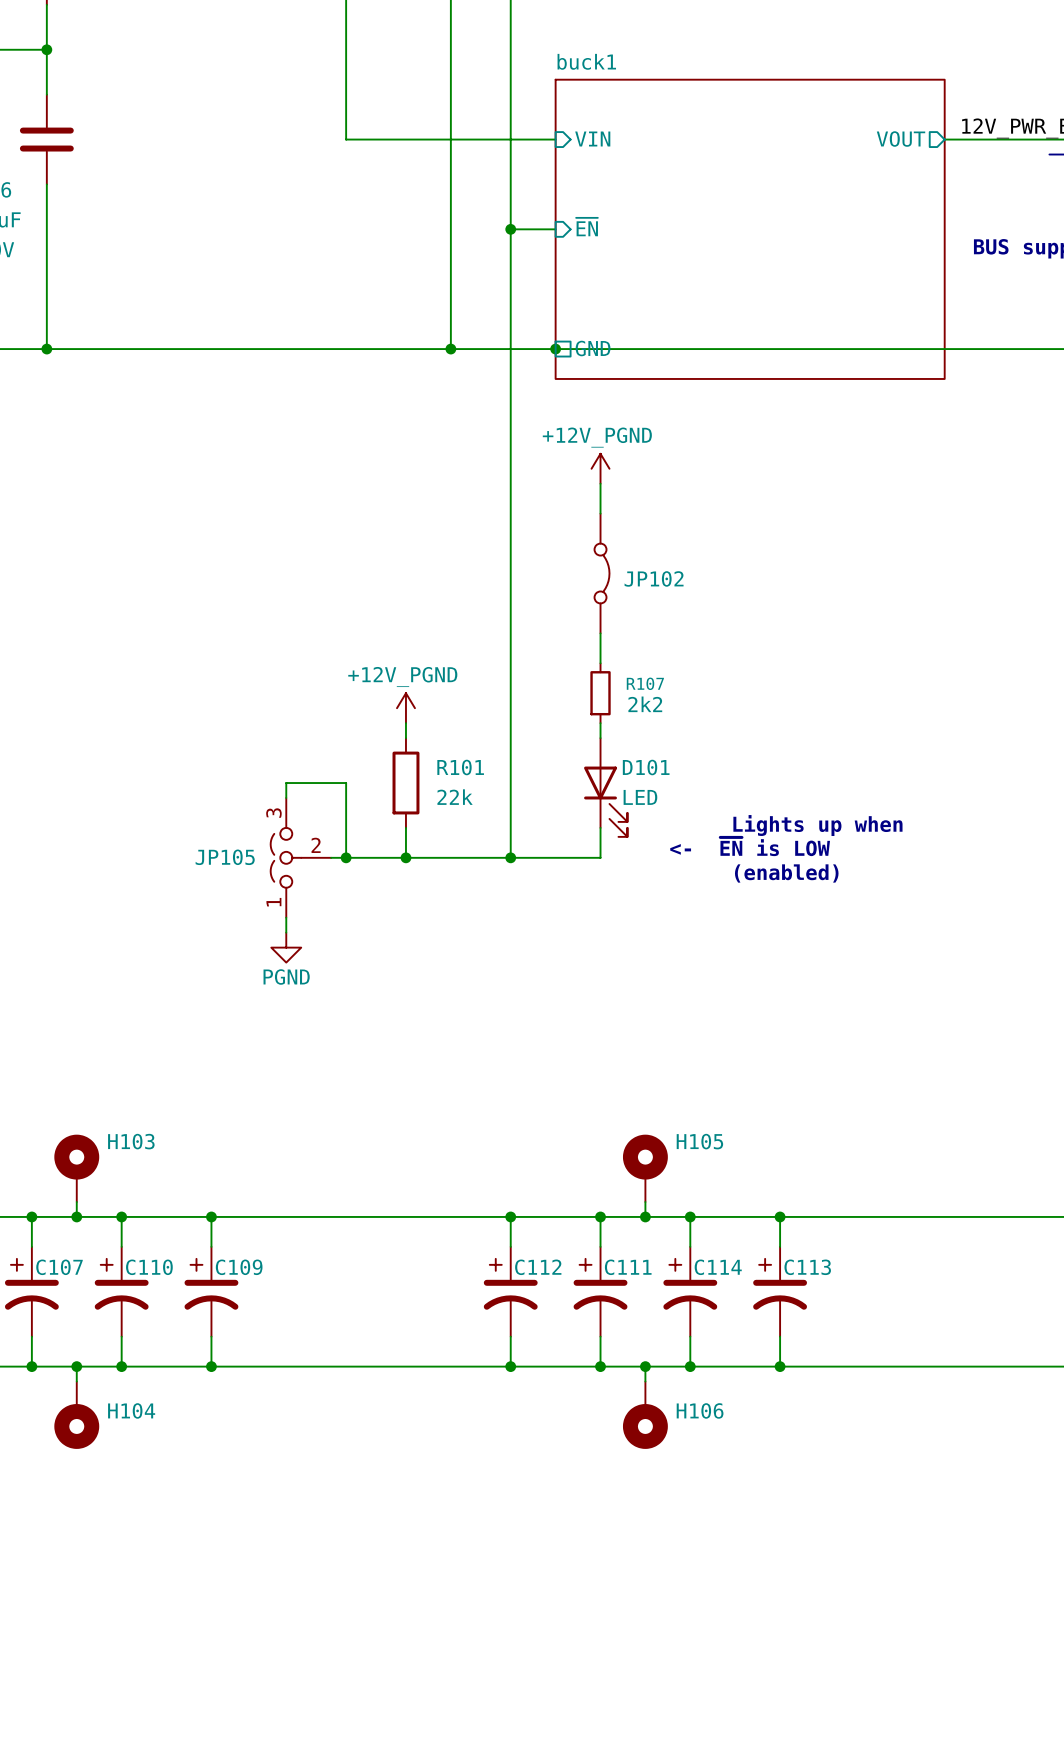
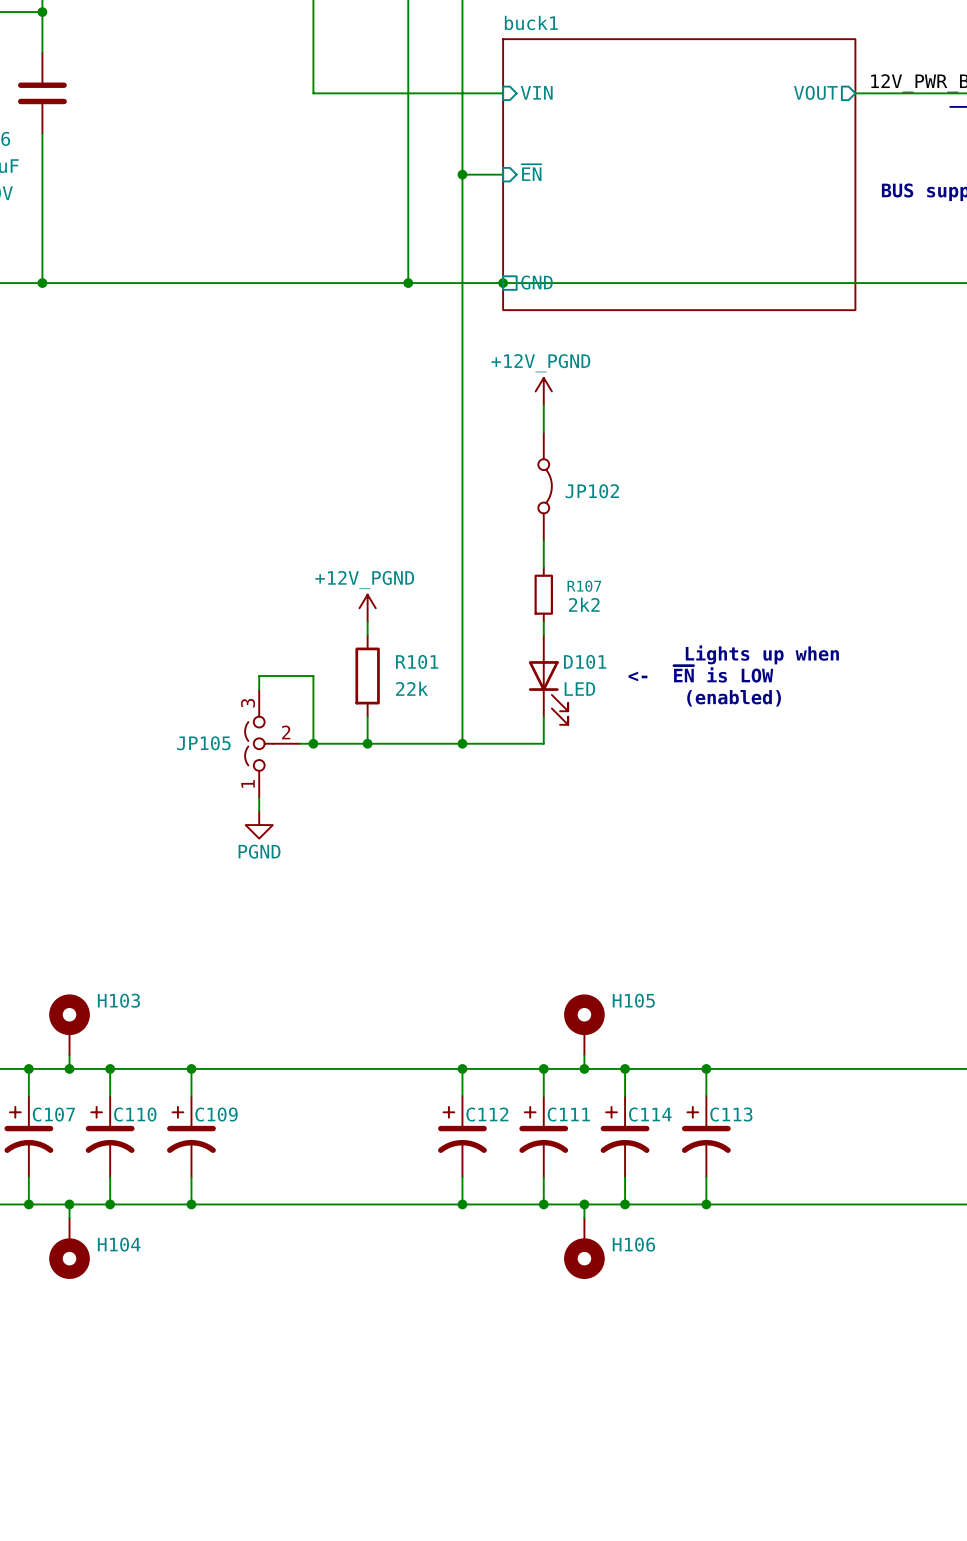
text position: Lights up when (817, 825) -> Lights up when (762, 654)
text position: <- ~{EN} is LOW (750, 846) -> <- ~{EN} is LOW (700, 674)
text position: (enabled) (786, 873) -> (enabled) (734, 698)

